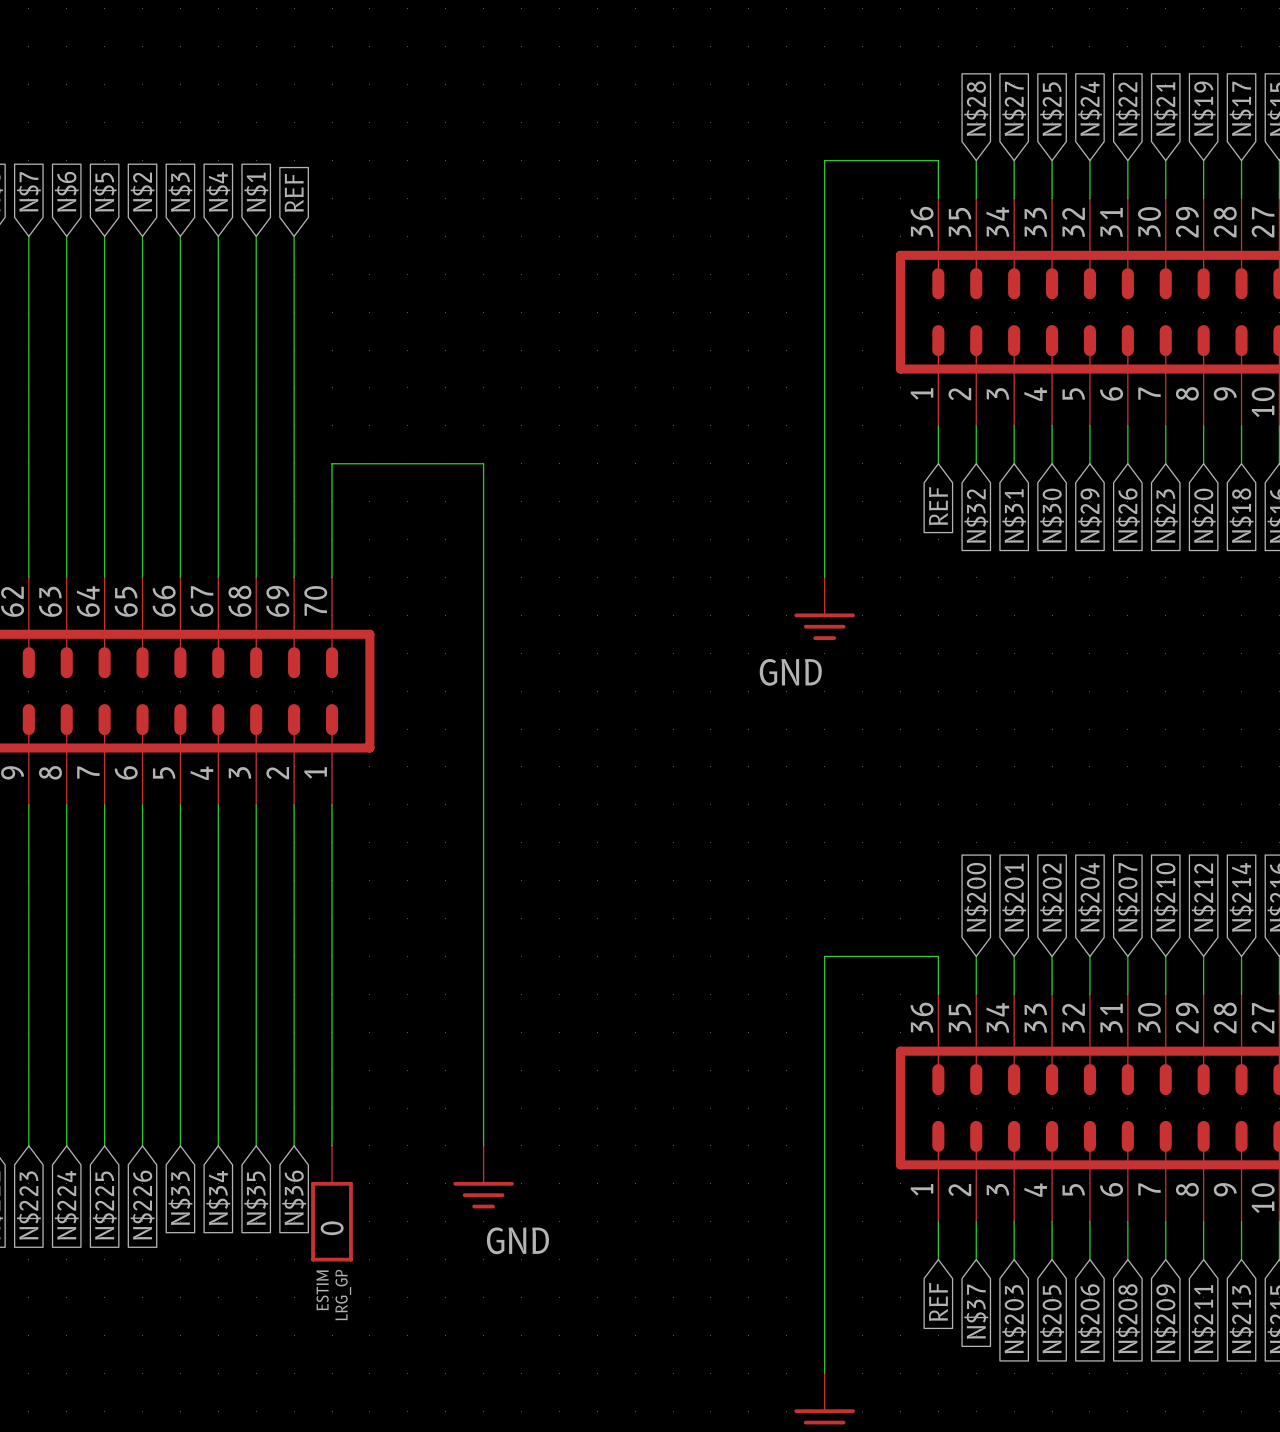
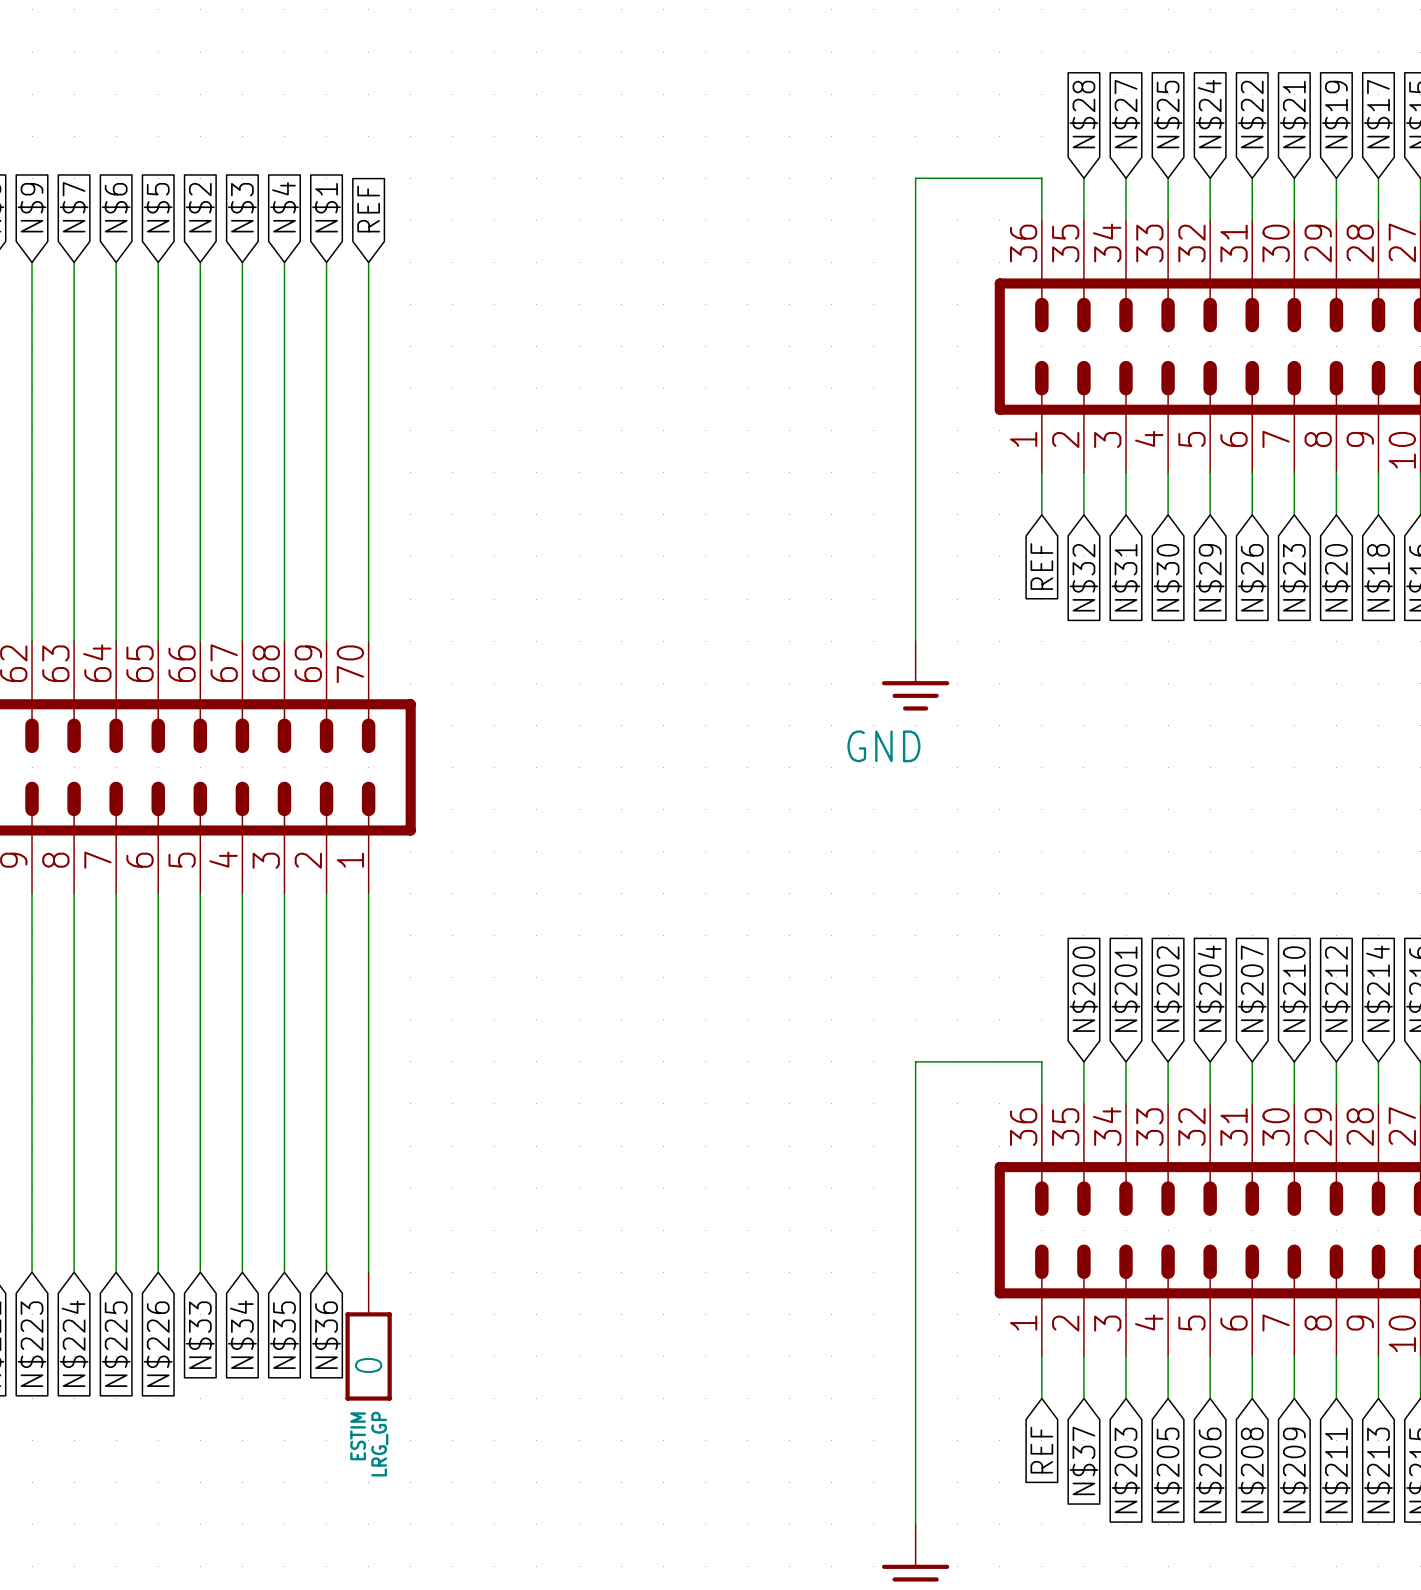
global label: N$7 (28, 191) -> N$9 (32, 207)
global label: N$6 (66, 191) -> N$7 (74, 207)
global label: N$4 (218, 191) -> N$3 (242, 207)
global label: N$5 (104, 192) -> N$6 (116, 207)
global label: N$2 (142, 192) -> N$5 (158, 207)
global label: N$3 (180, 192) -> N$2 (200, 207)
global label: N$1 (256, 192) -> N$4 (284, 207)
global label: REF (294, 192) -> N$1 (326, 207)
global label: none -> REF (368, 209)
wire: (332, 463) (483, 463) (483, 1145) -> (368, 514) (368, 262)
power symbol: GND (483, 1177) -> none

